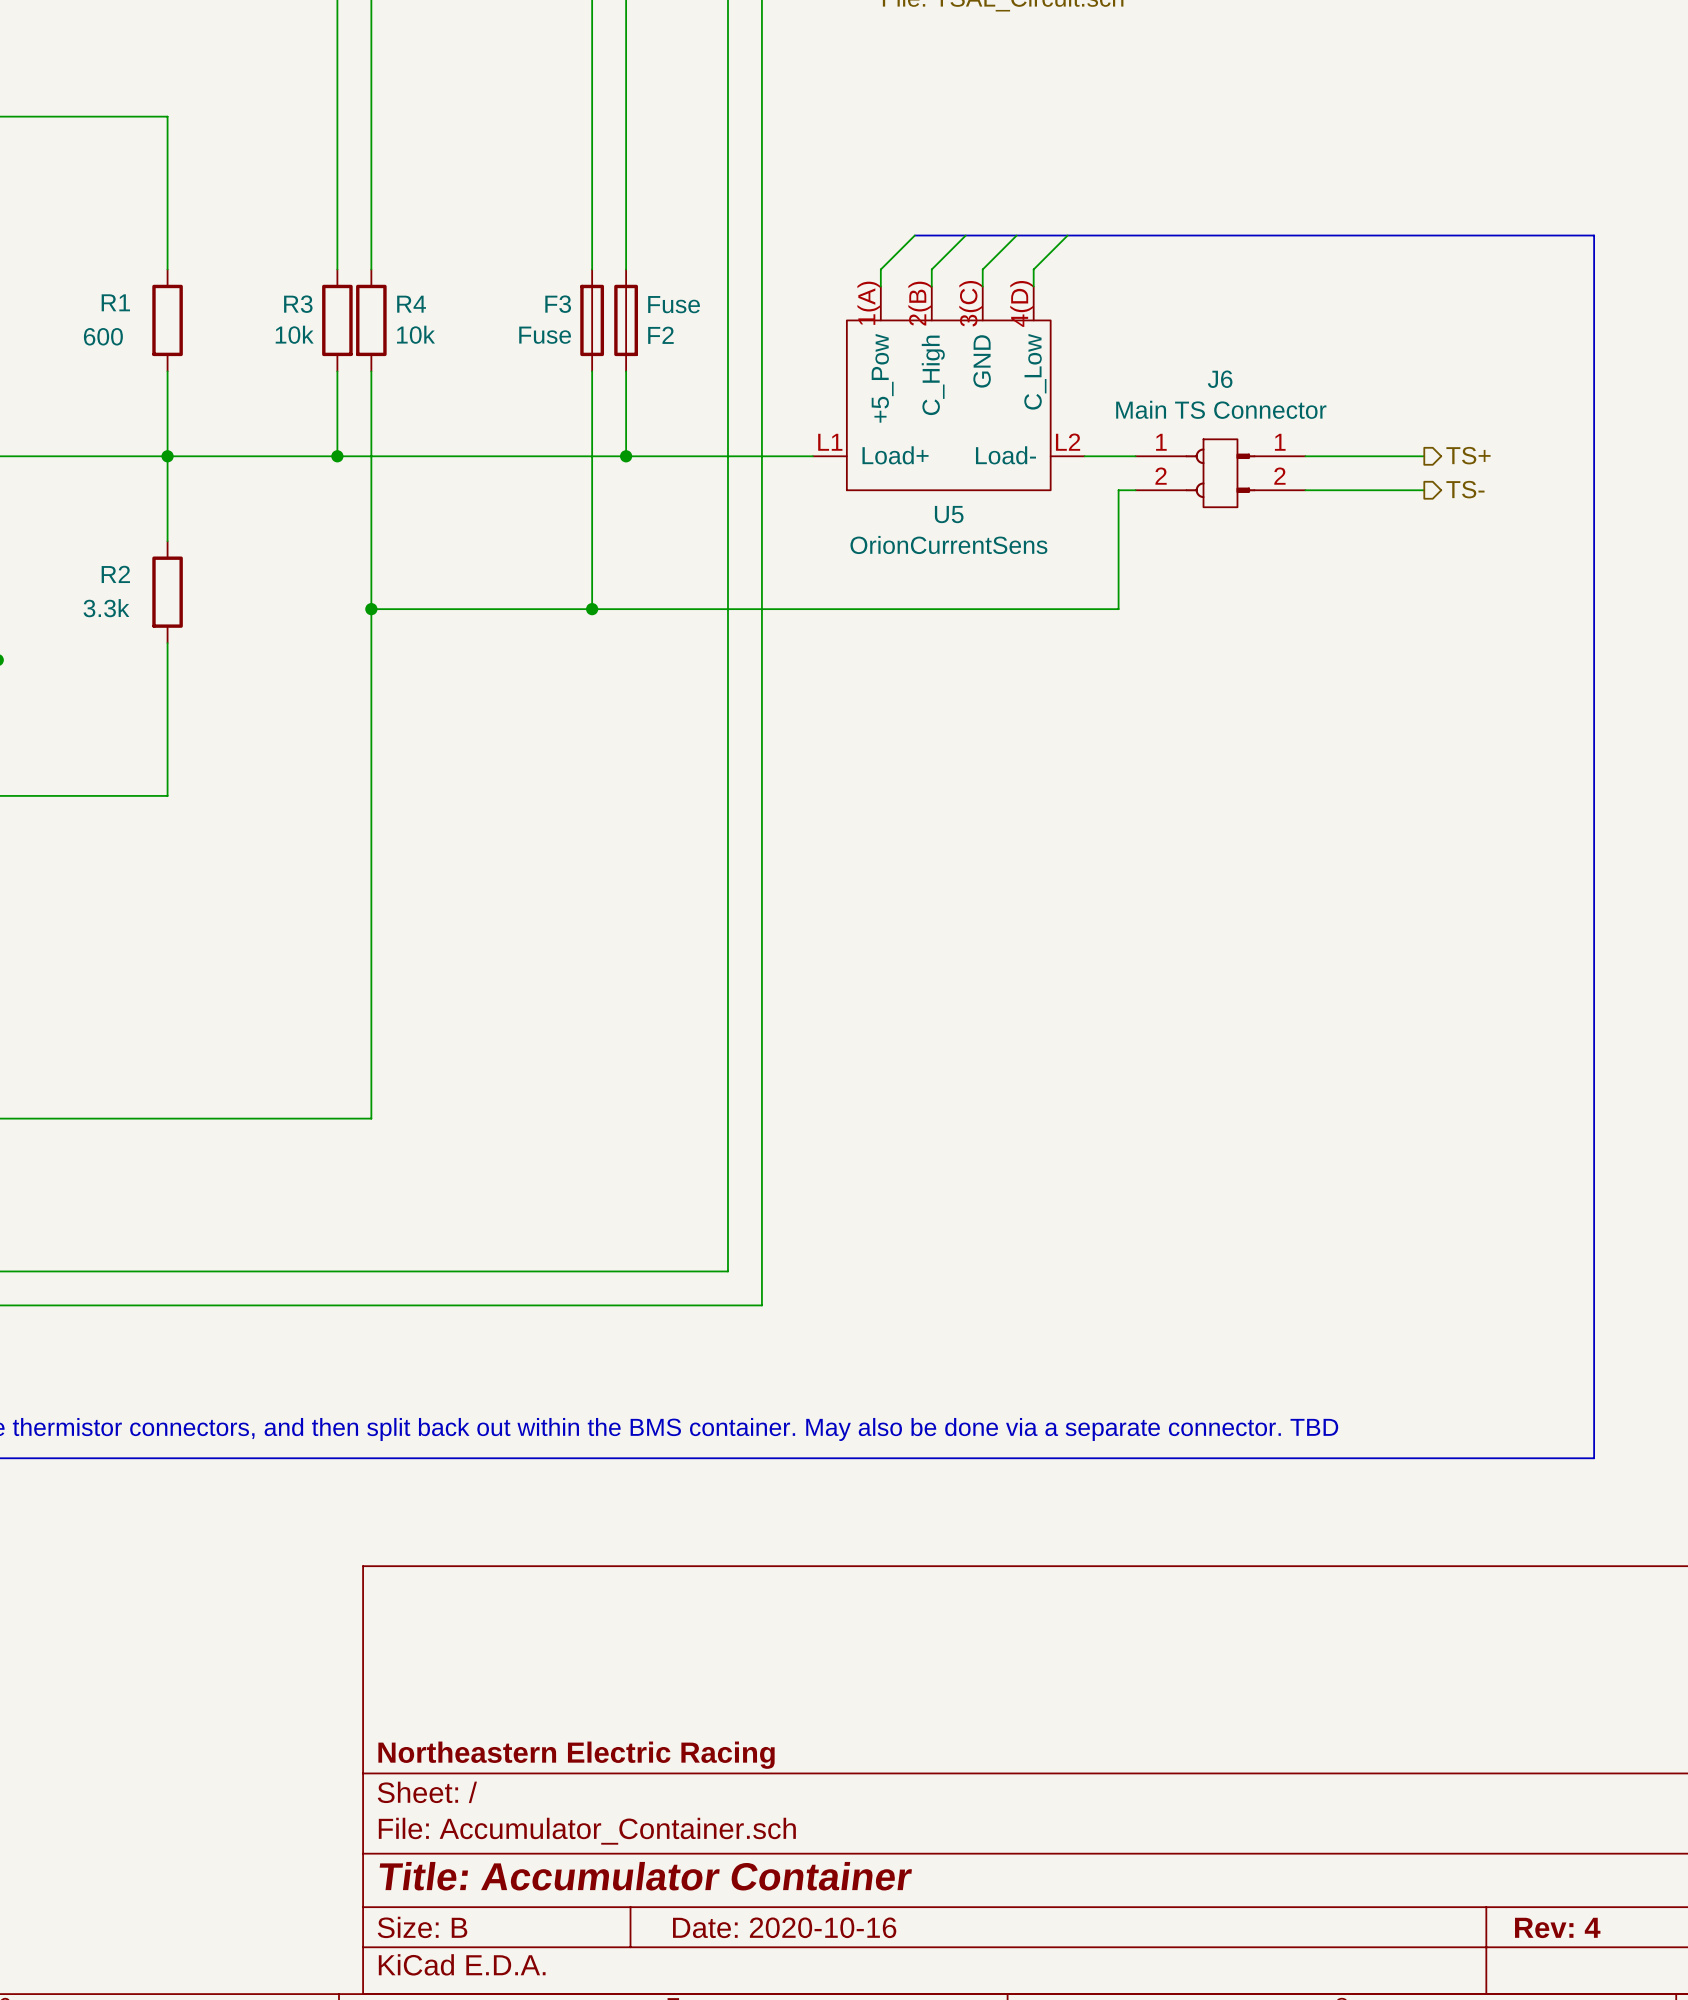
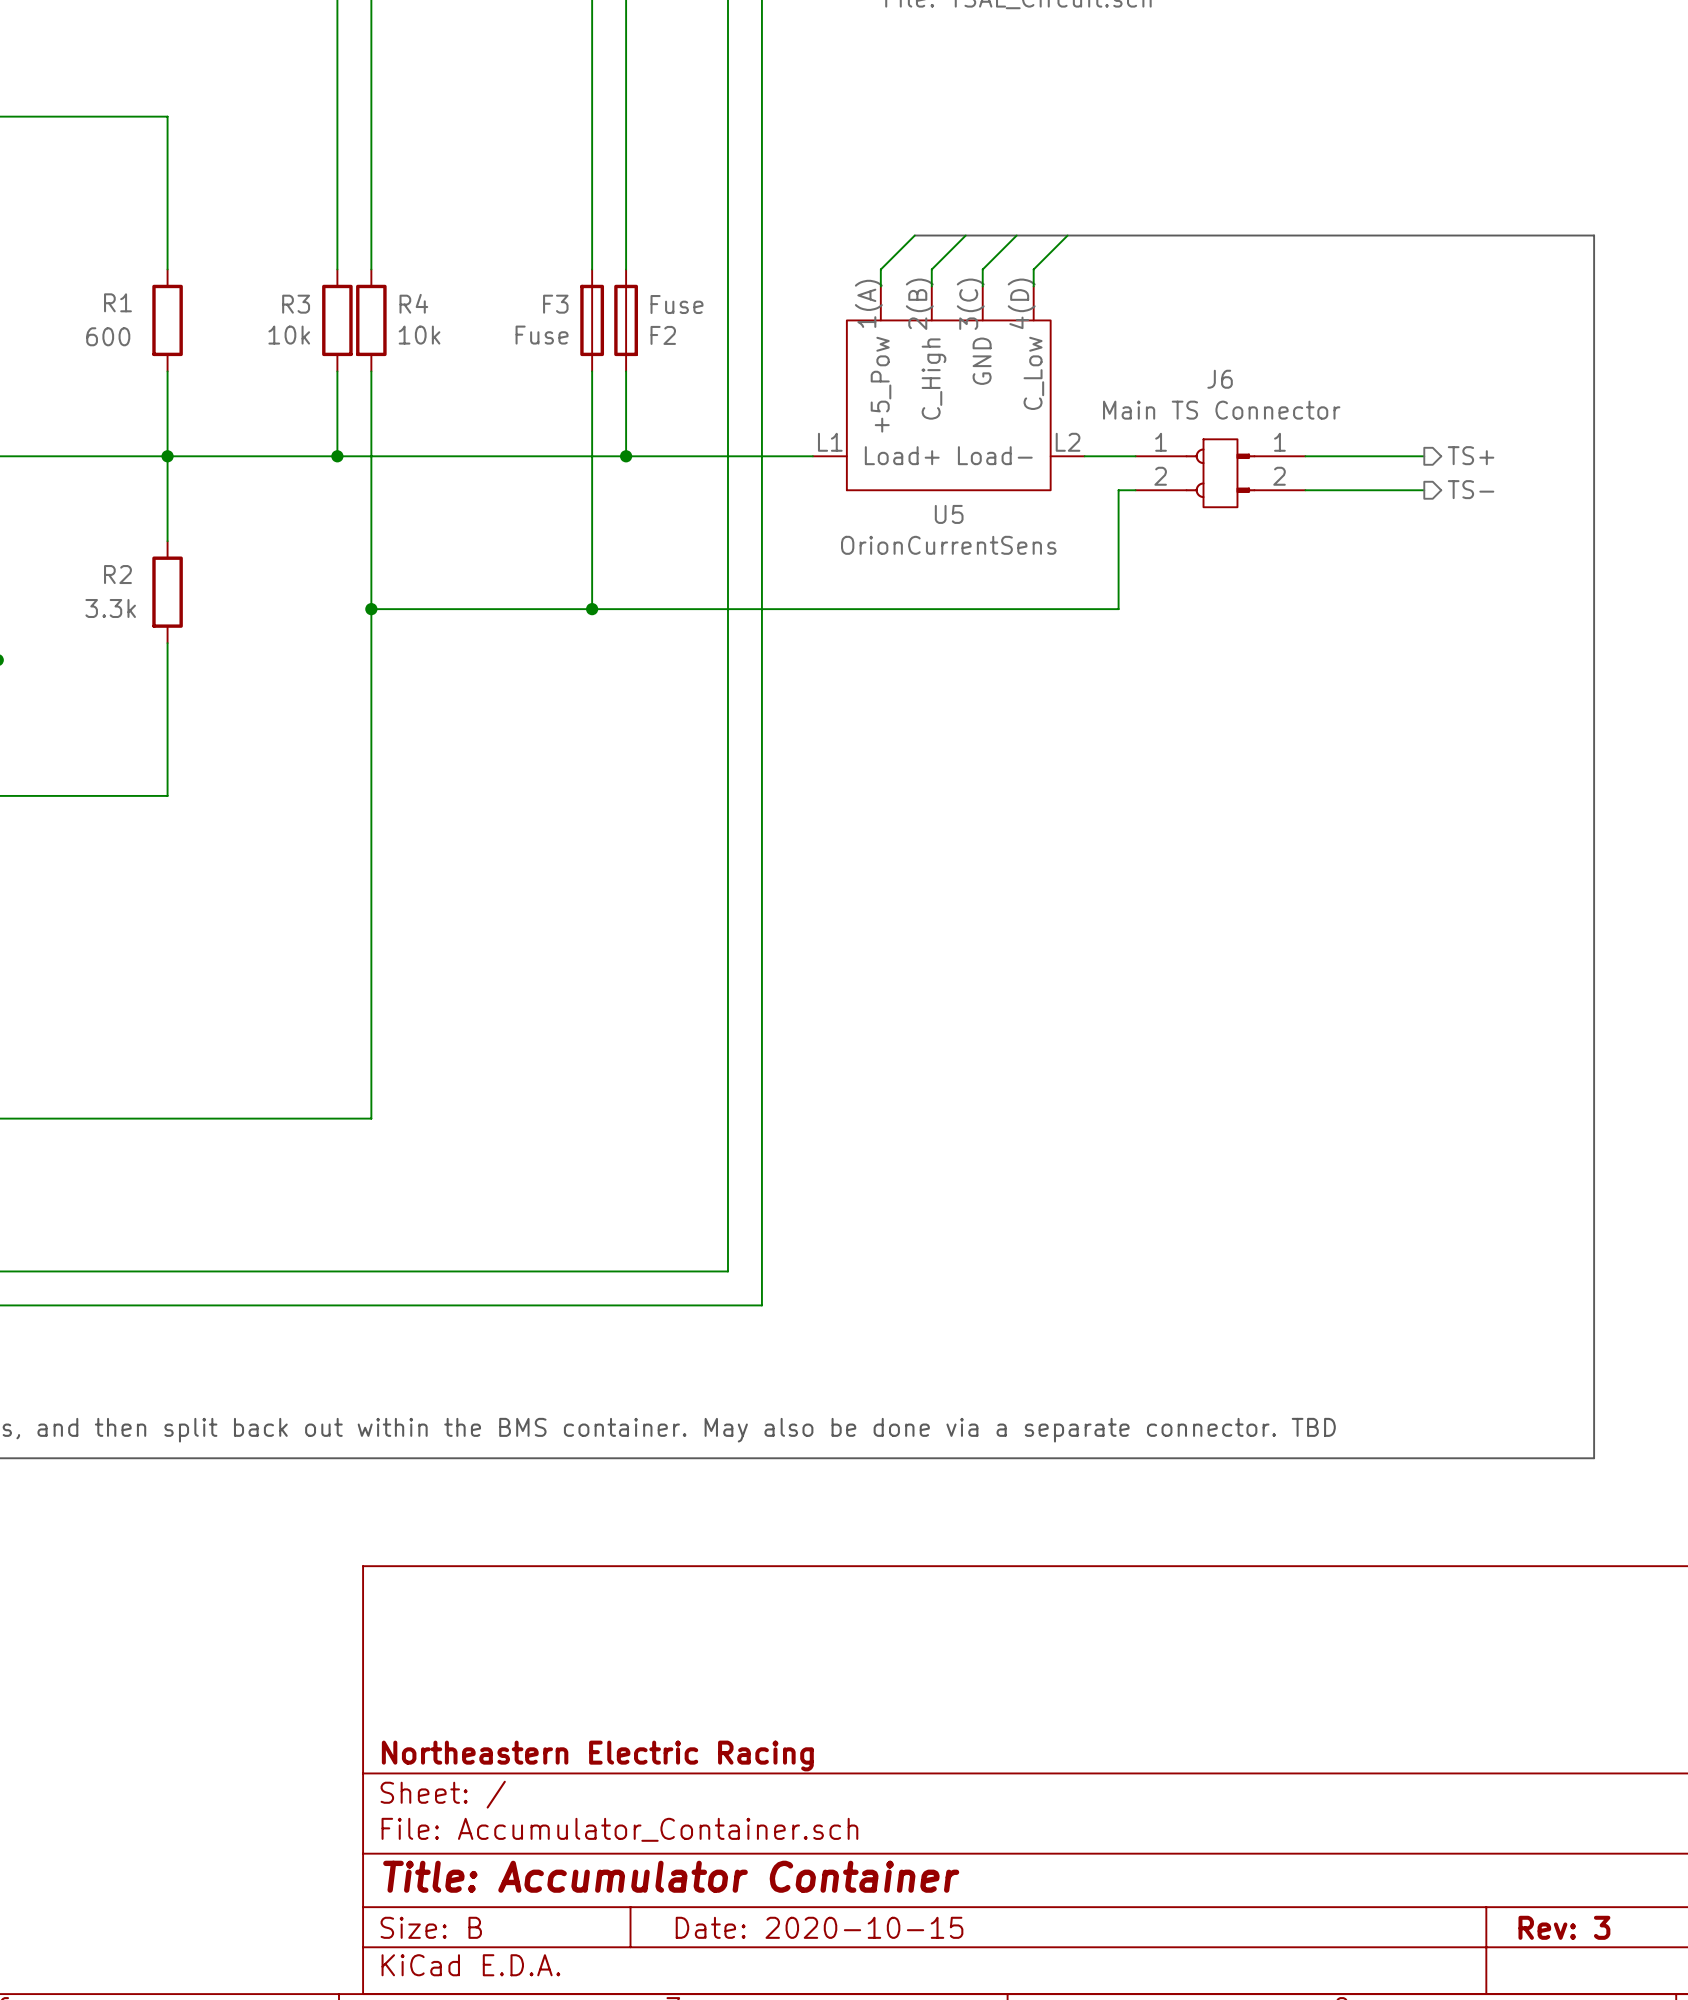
title block: Date: 2020-10-16 (784, 1927) -> Date: 2020-10-15 (819, 1927)
title block: Rev: 4 (1557, 1927) -> Rev: 3 (1564, 1927)

